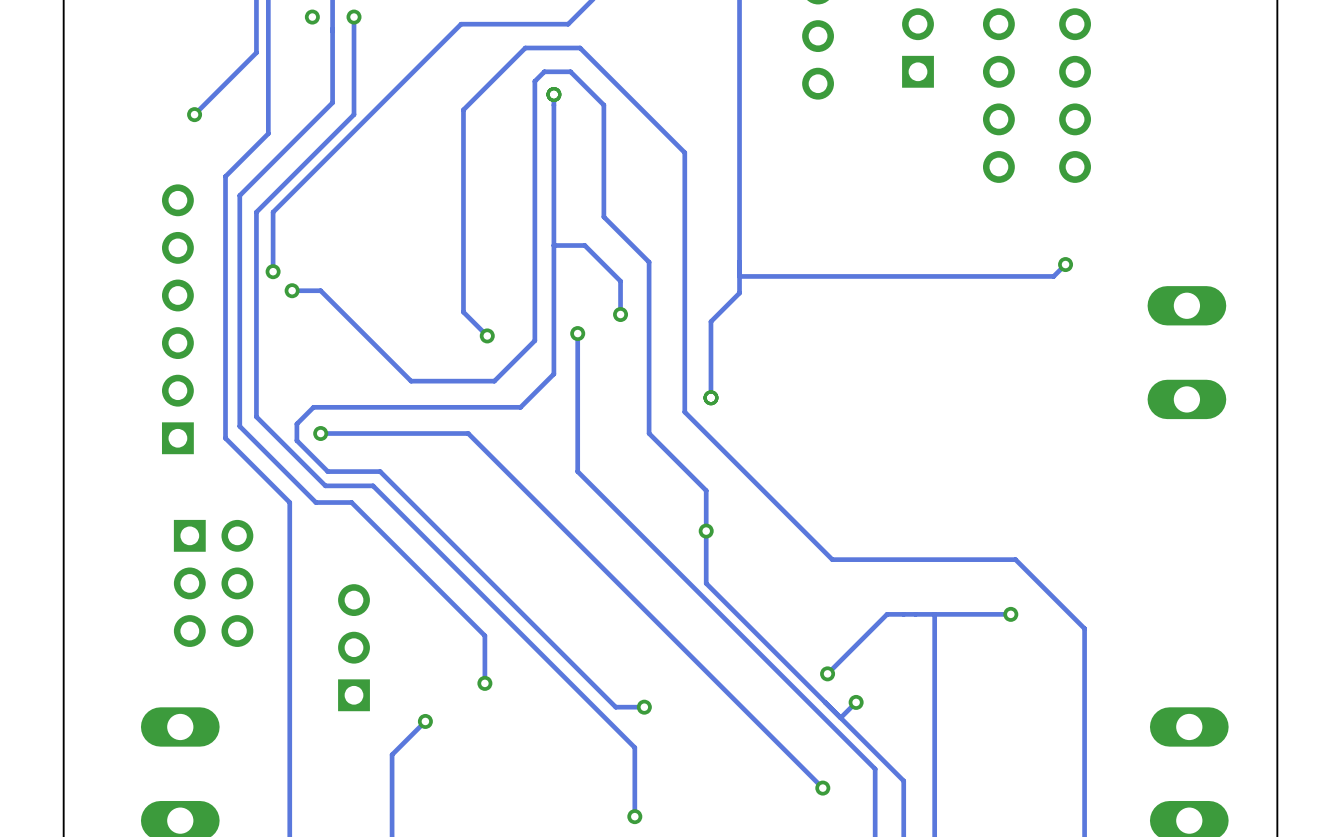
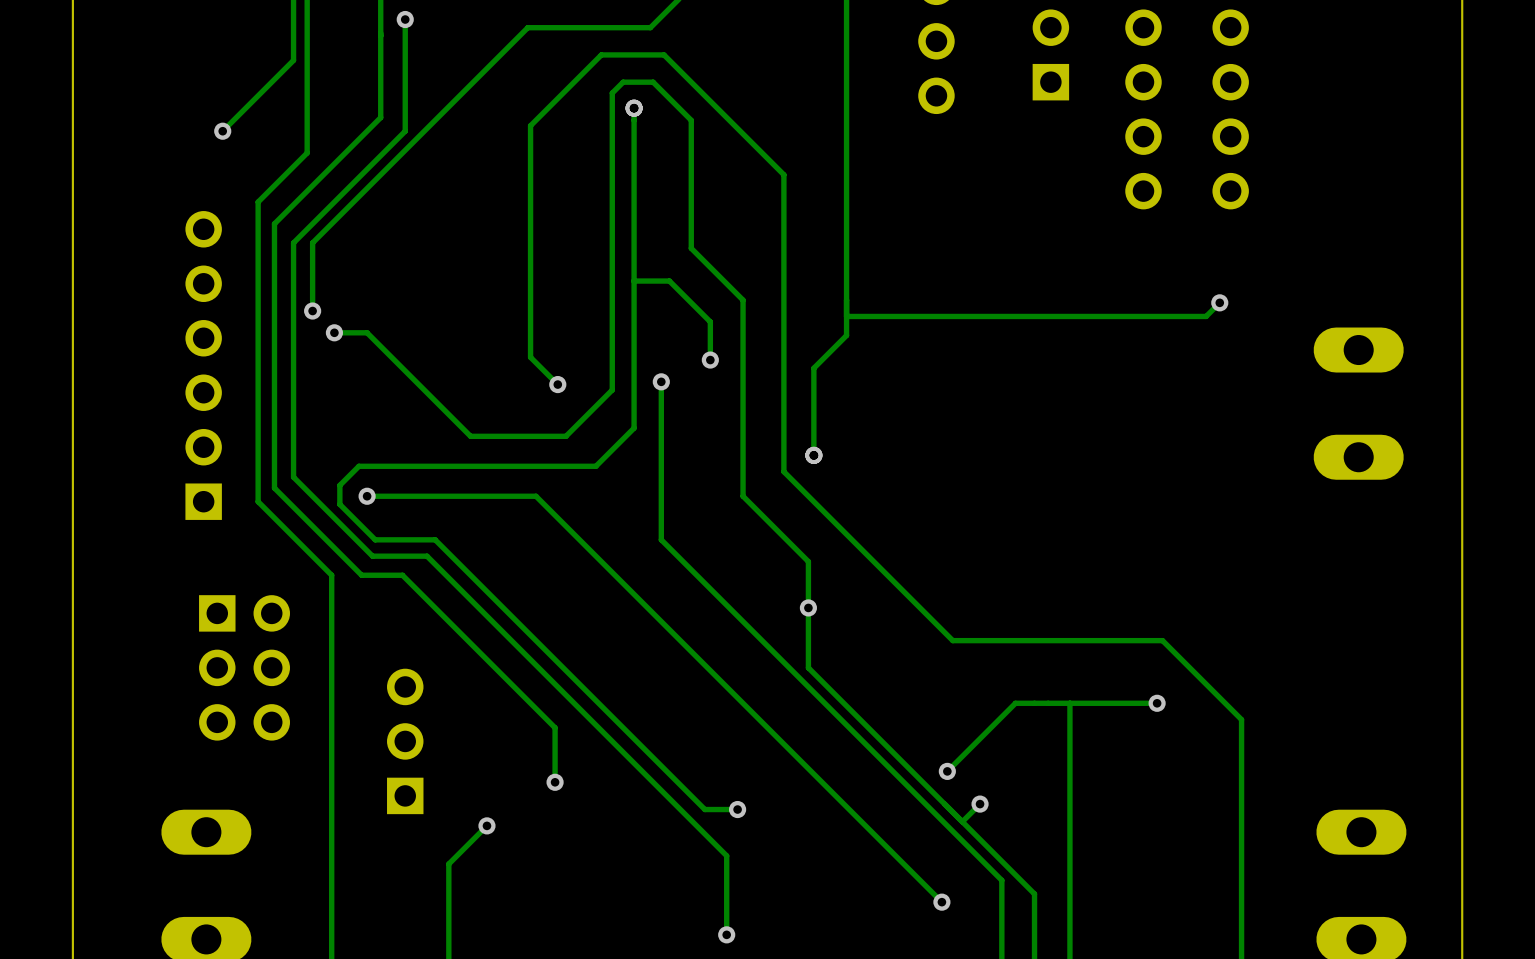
via: (312, 17) -> none

